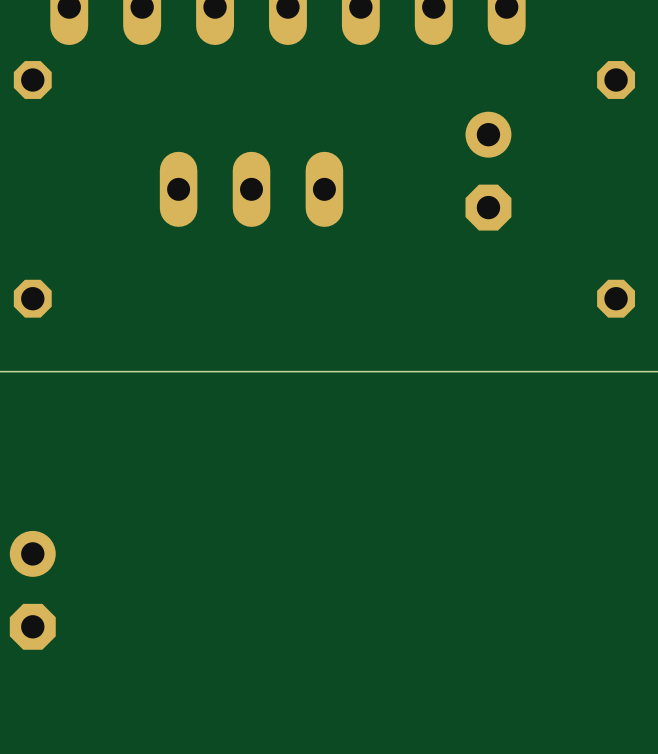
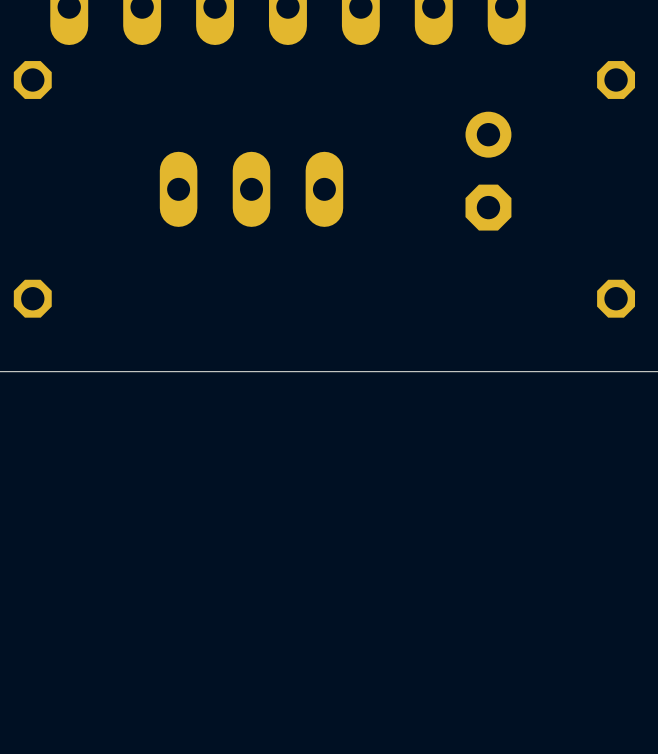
part: (32, 590) -> none

